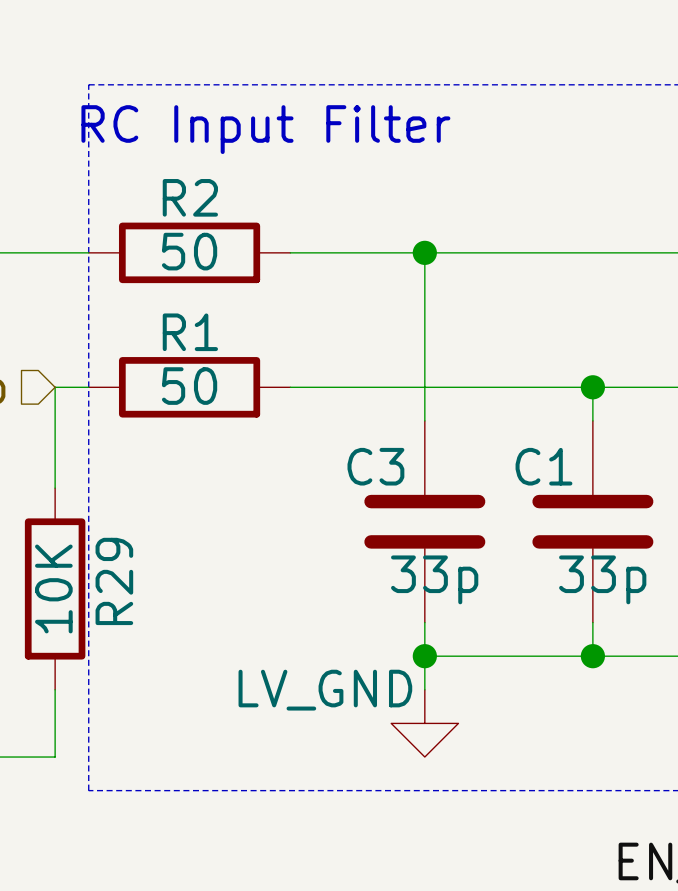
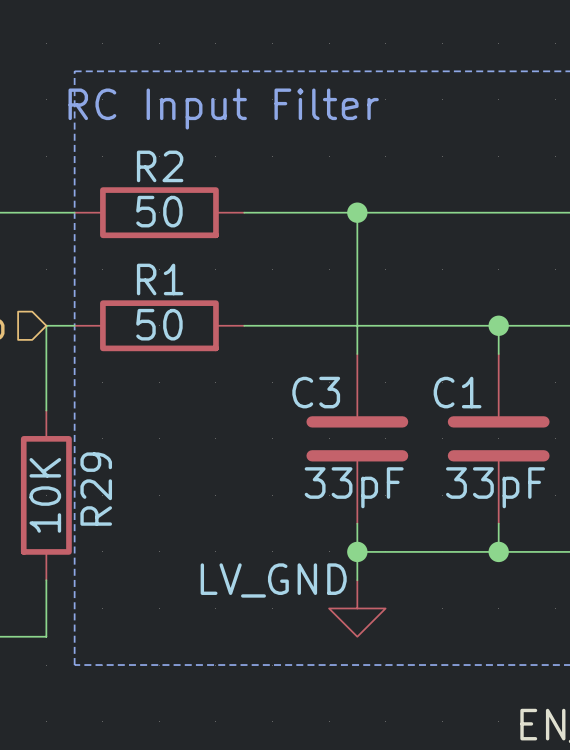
C3 value: 33p (434, 579) -> 33pF (354, 487)
C1 value: 33p (602, 579) -> 33pF (495, 487)

